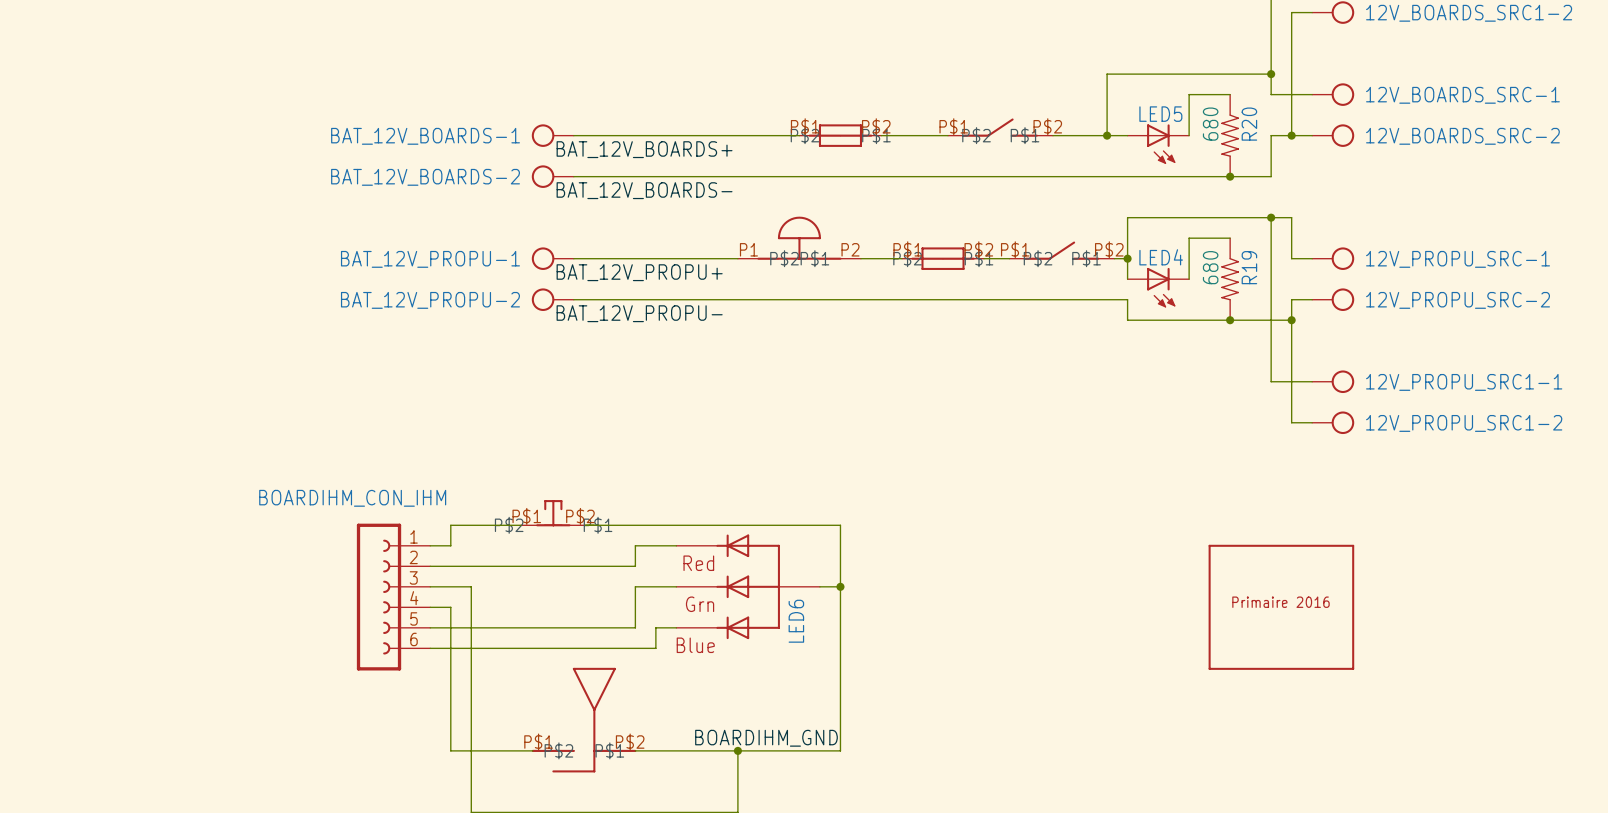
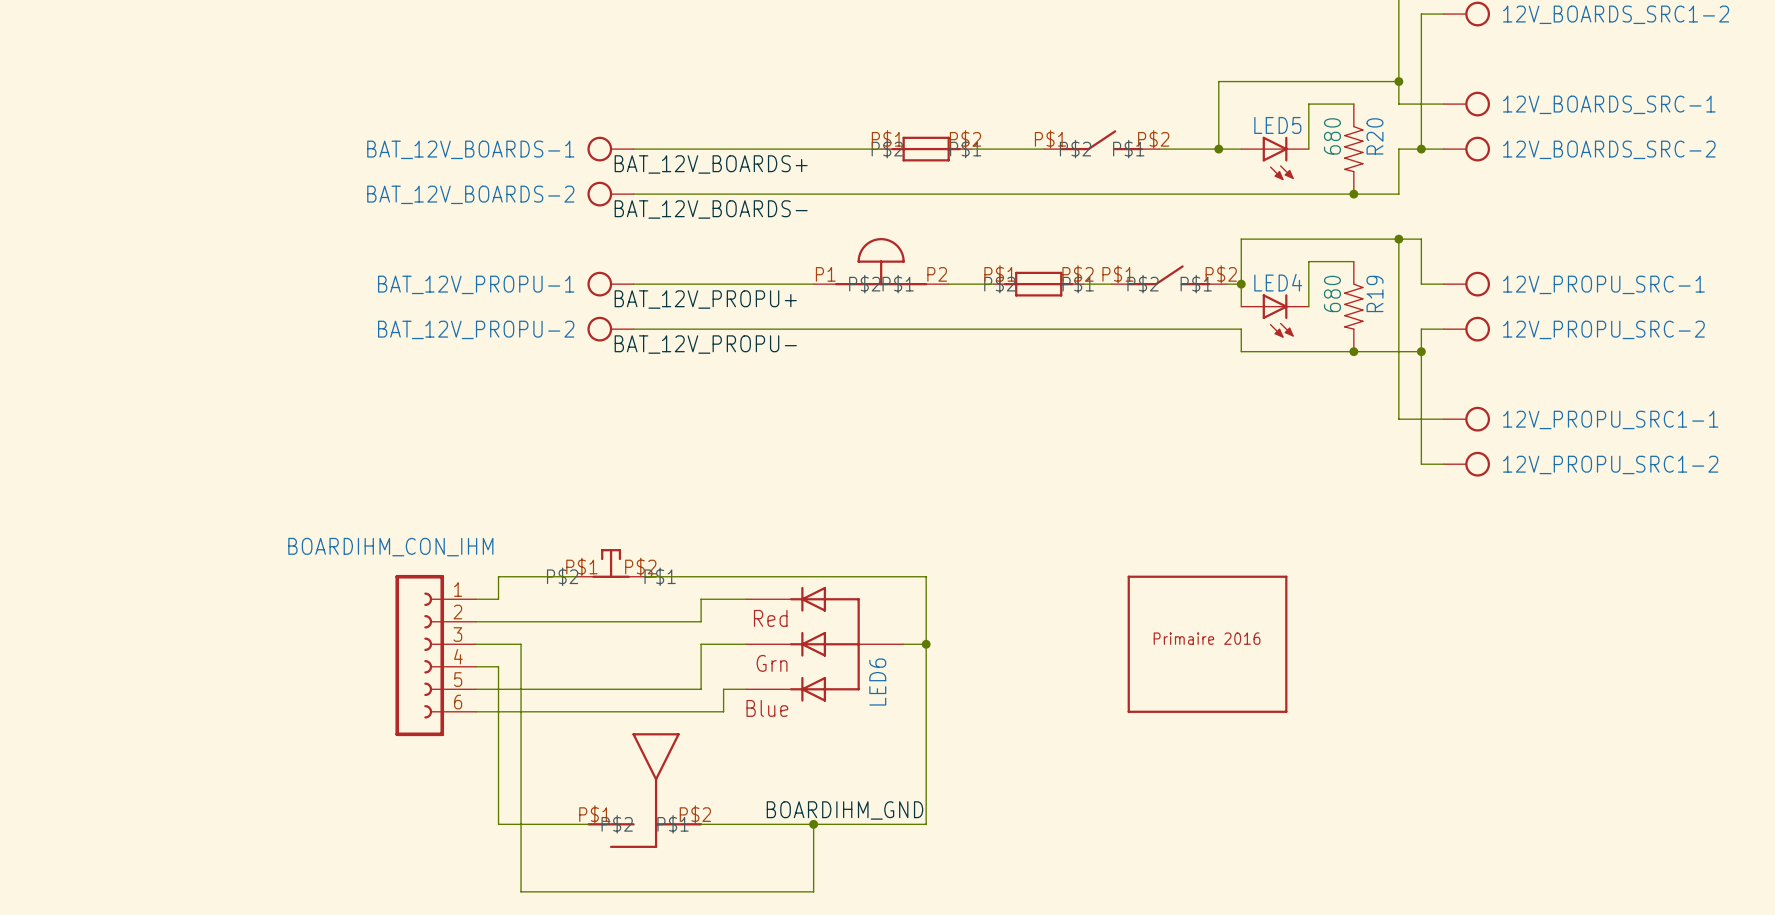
part position: (1281, 607) -> (1207, 644)

